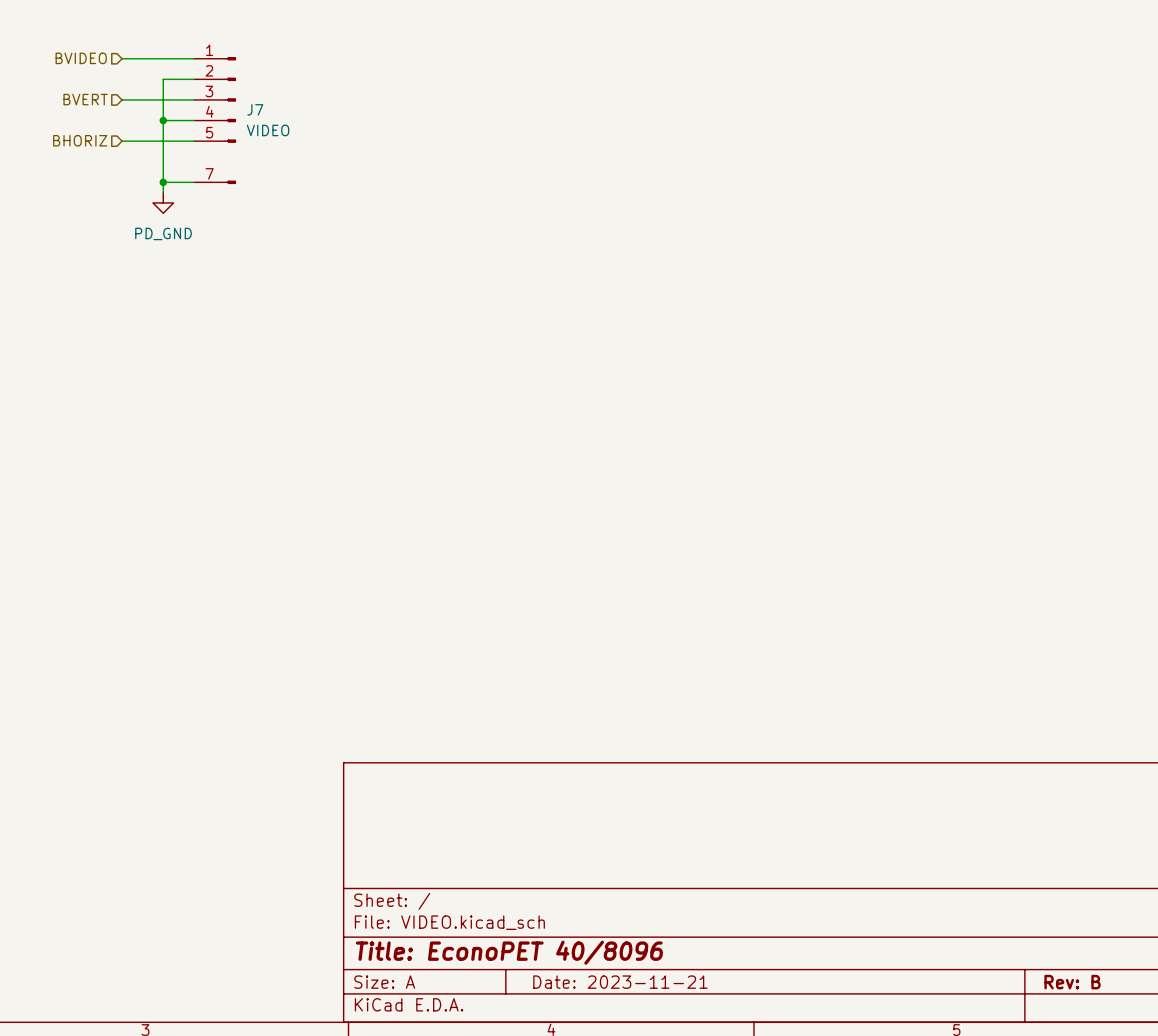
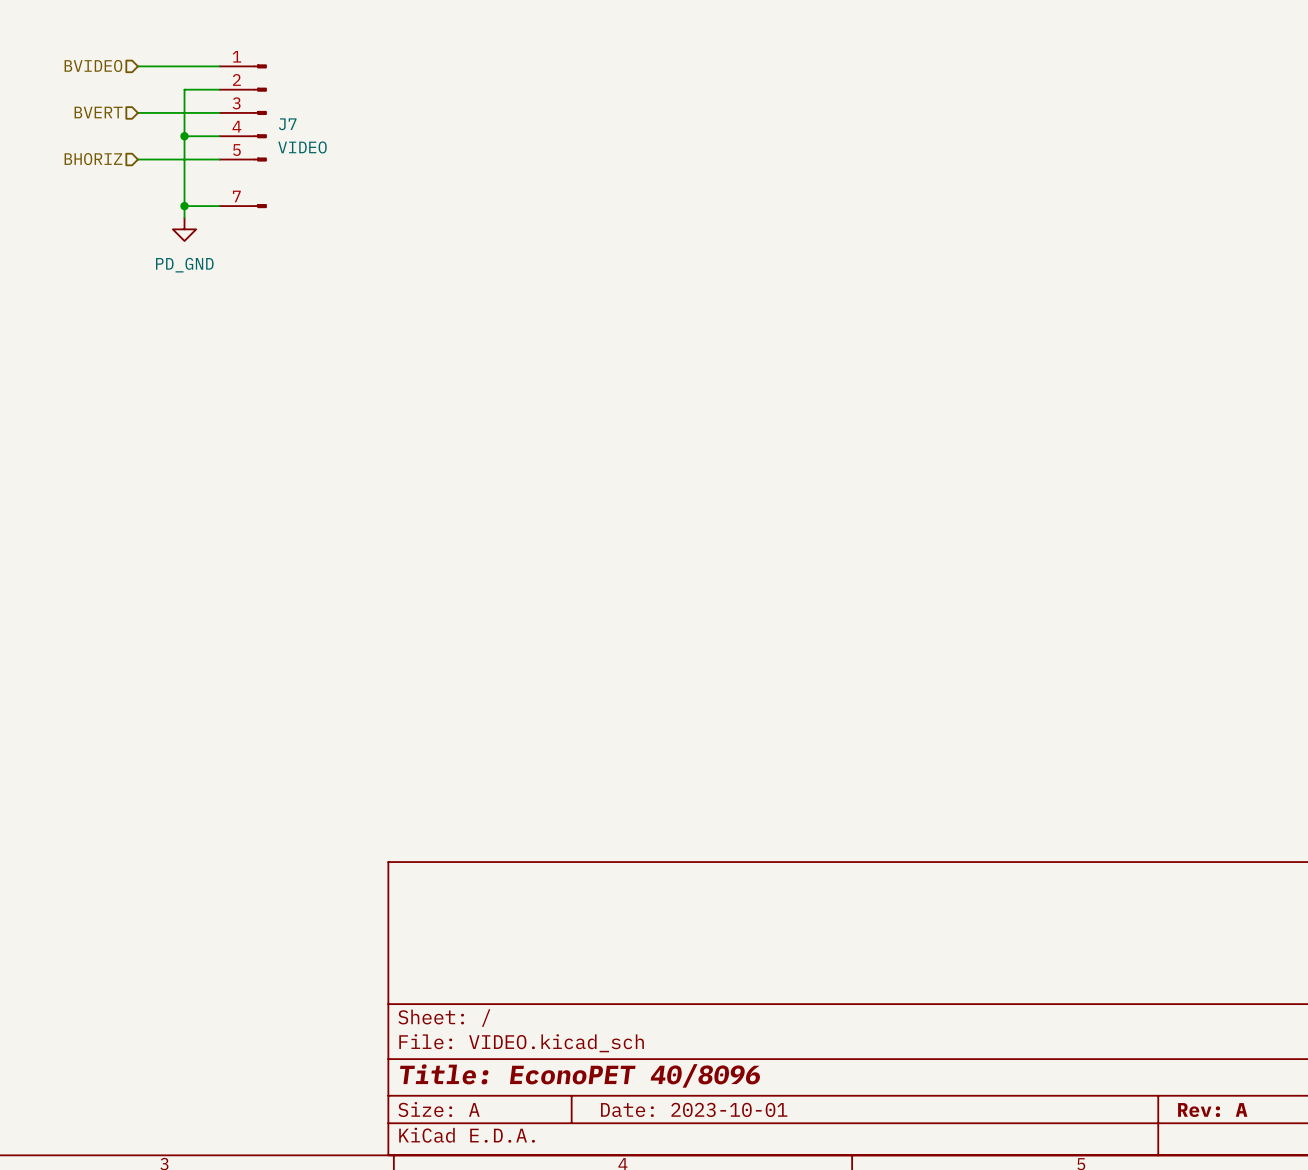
title block: Date: 2023-11-21 (620, 982) -> Date: 2023-10-01 (694, 1109)
title block: Rev: B (1072, 982) -> Rev: A (1212, 1110)

